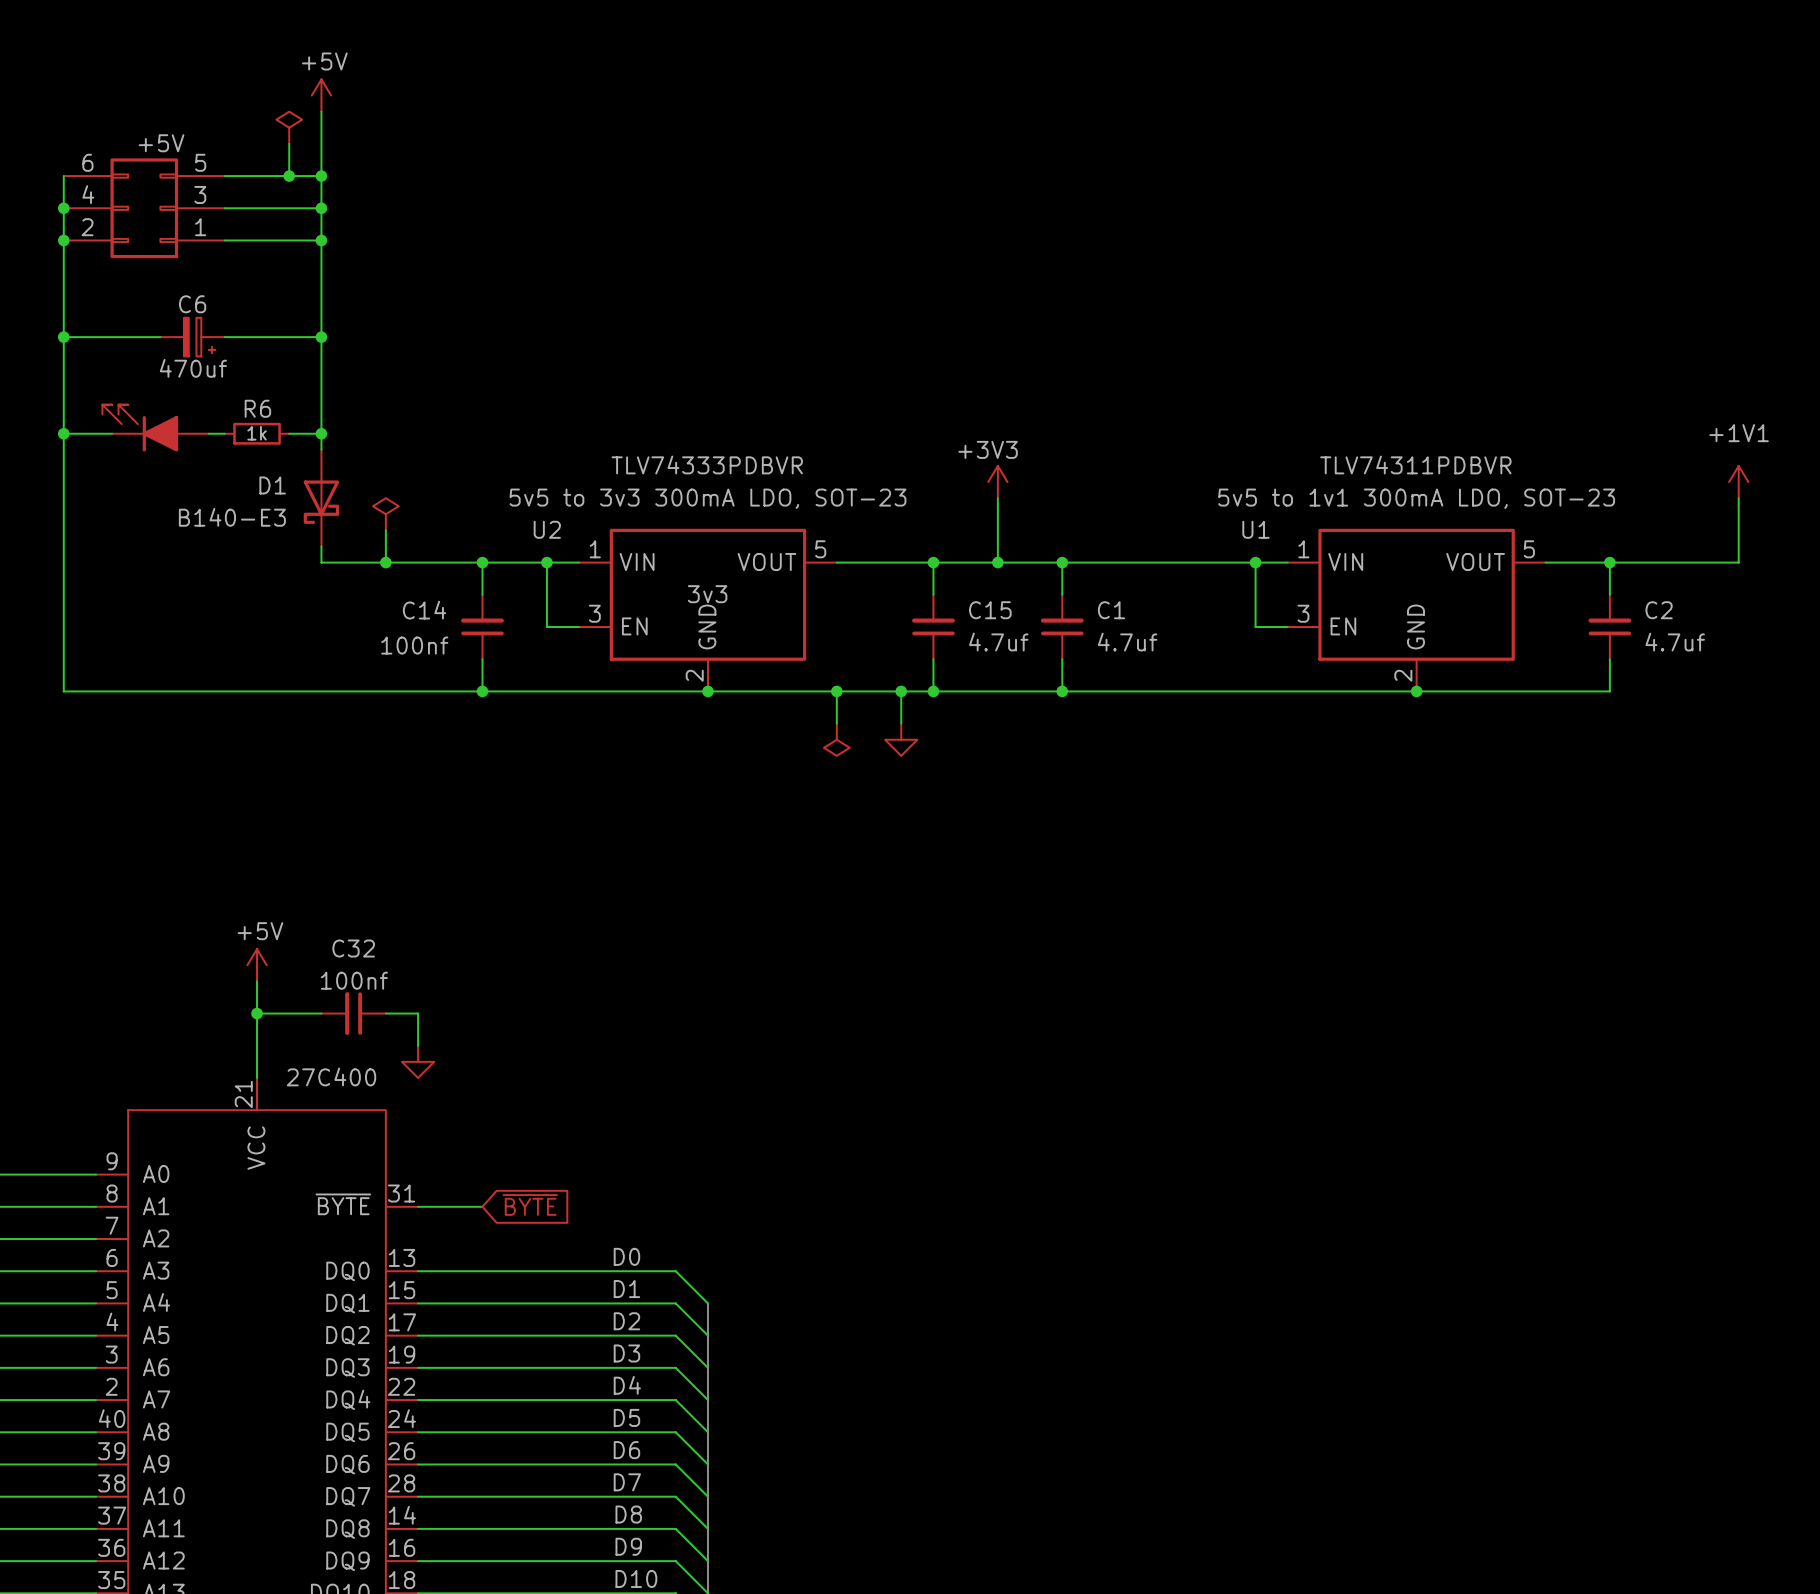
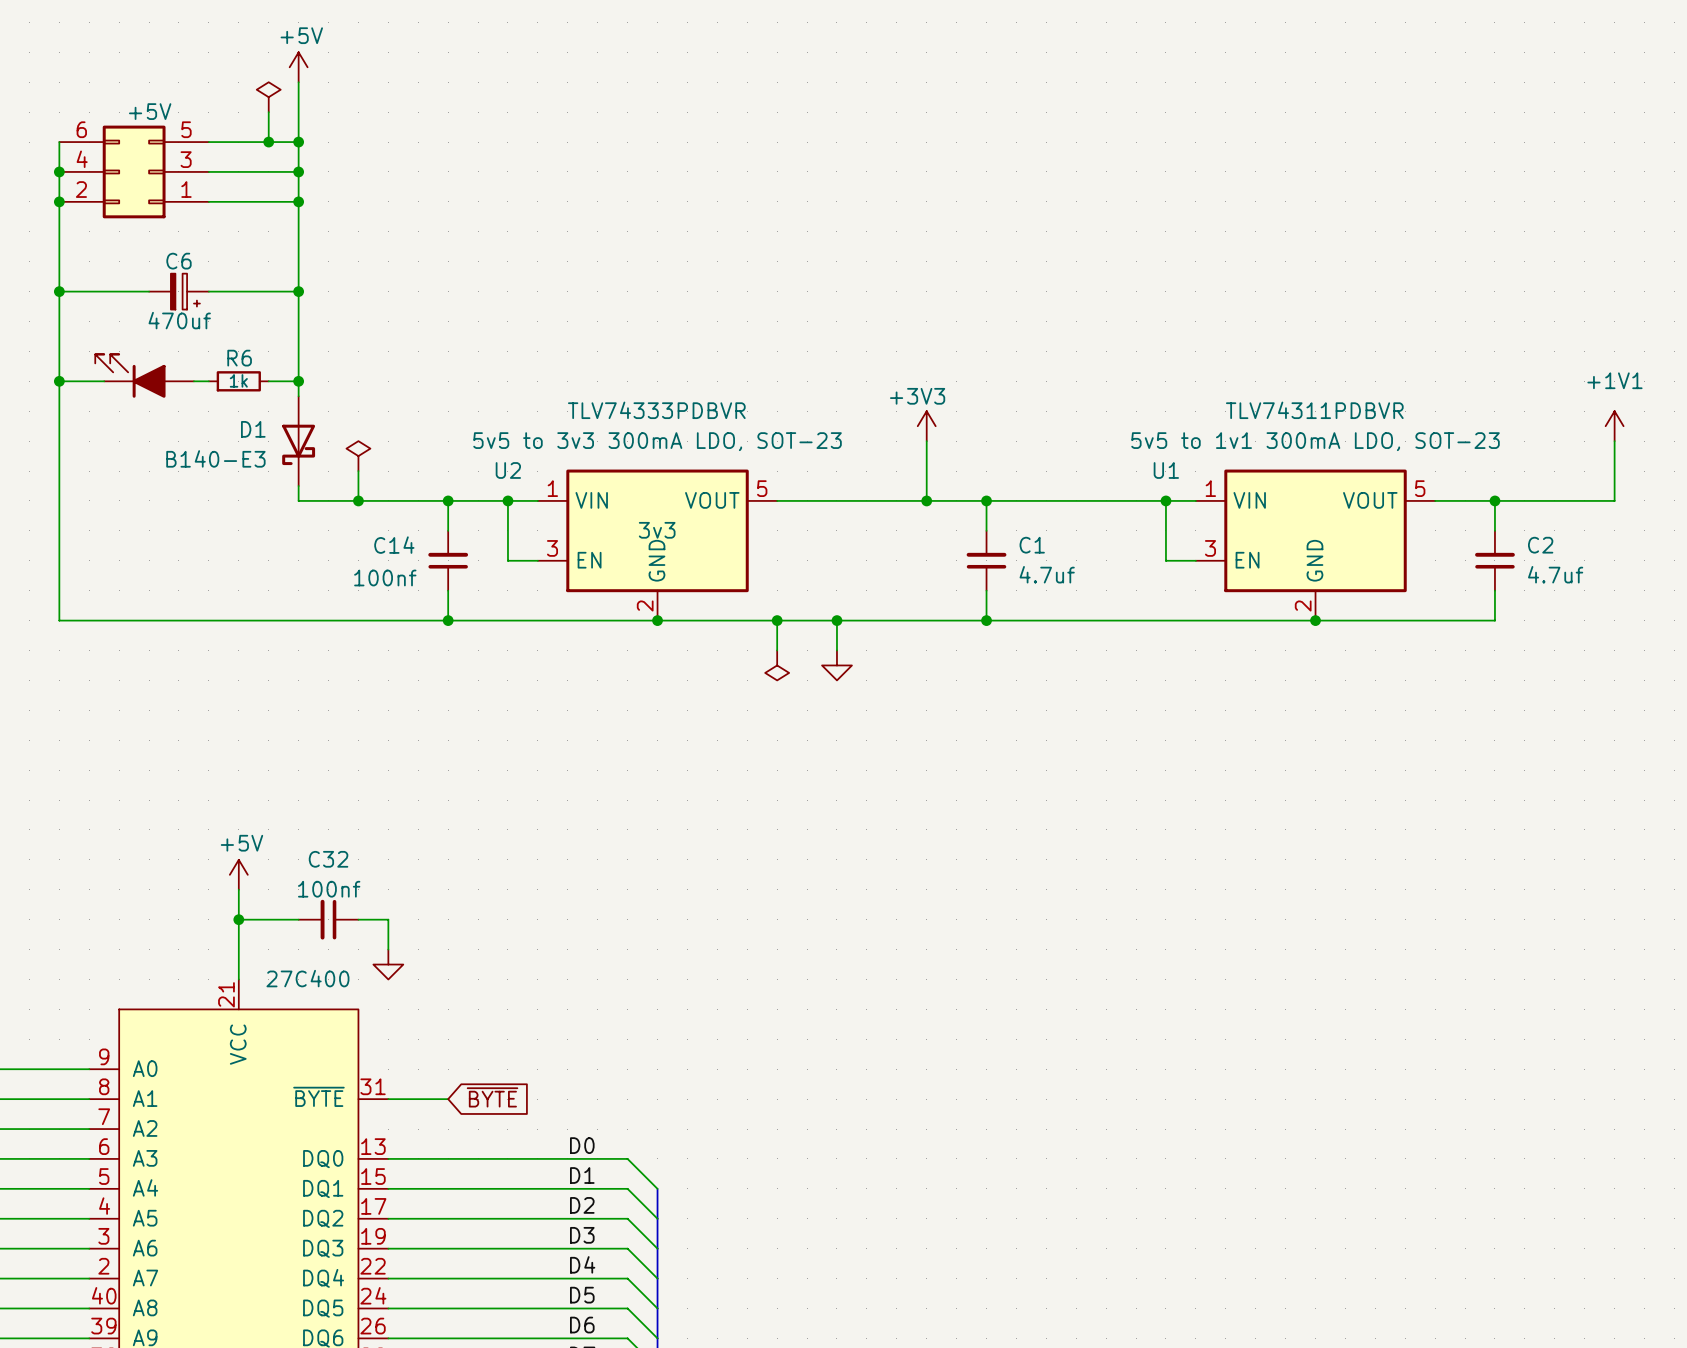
wire: (933, 562) (933, 594) -> none
junction: (933, 562) -> none
C15: 4.7uf (933, 627) -> none
wire: (933, 659) (933, 691) -> none
junction: (933, 691) -> none

